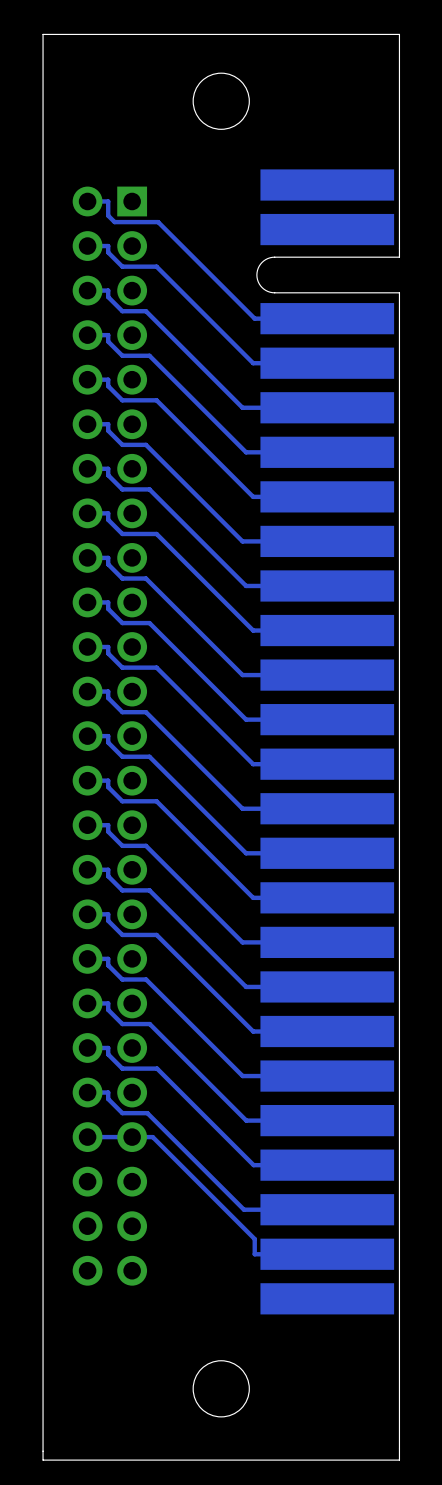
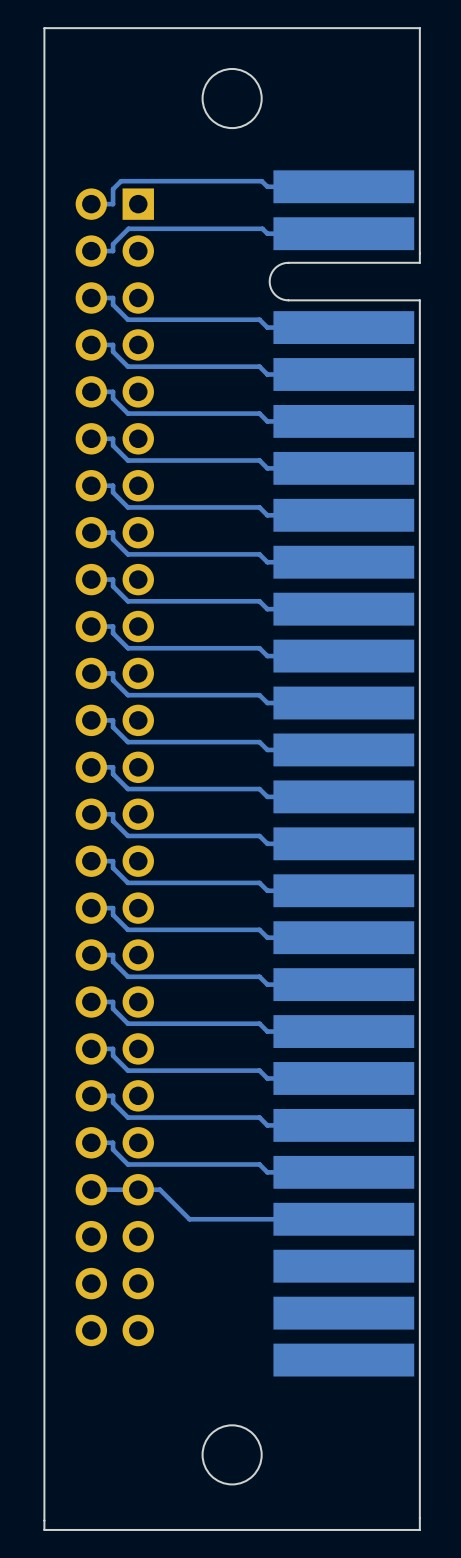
track: (108, 201) (108, 215) (114, 222) (158, 222) (247, 311) -> (113, 204) (113, 189) (121, 181) (261, 181) (267, 186) (343, 186)
track: (108, 246) (108, 252) (122, 266) (156, 266) (254, 363) -> (113, 251) (113, 244) (128, 228) (262, 228) (267, 233) (343, 233)
track: (145, 311) (242, 407) (254, 407) -> (152, 319) (259, 319)
track: (149, 355) (246, 452) (254, 452) -> (156, 366) (259, 366) (267, 374)
track: (156, 400) (254, 496) -> (164, 413) (259, 413) (267, 421)
track: (145, 444) (242, 541) (254, 541) -> (152, 460) (259, 460) (267, 468)
track: (149, 489) (246, 585) (254, 585) -> (156, 507) (259, 507) (267, 515)
track: (156, 533) (254, 630) -> (164, 554) (259, 554) (267, 562)
track: (145, 578) (242, 675) (254, 675) -> (152, 601) (259, 601) (267, 609)
track: (149, 623) (246, 719) (254, 719) -> (156, 648) (259, 648) (267, 656)
track: (156, 667) (254, 764) -> (164, 695) (259, 695) (267, 703)
track: (145, 712) (242, 808) (254, 808) -> (152, 742) (259, 742) (267, 749)
track: (149, 756) (246, 853) (254, 853) -> (156, 789) (259, 789) (267, 796)
track: (156, 801) (254, 897) -> (164, 835) (259, 835) (267, 843)
track: (146, 845) (242, 942) (254, 942) -> (152, 882) (259, 882) (267, 890)
track: (149, 890) (246, 986) (254, 986) -> (156, 929) (259, 929) (267, 937)
track: (156, 934) (254, 1031) -> (164, 976) (259, 976) (267, 984)
track: (146, 979) (242, 1076) (254, 1076) -> (152, 1023) (259, 1023) (267, 1031)
track: (149, 1024) (246, 1120) (254, 1120) -> (156, 1070) (259, 1070) (267, 1078)
track: (157, 1068) (253, 1165) -> (164, 1117) (259, 1117) (267, 1125)
track: (147, 1113) (243, 1209) (327, 1209) -> (154, 1164) (259, 1164) (267, 1172)
track: (180, 1165) (254, 1239) (254, 1254) (327, 1254) -> (189, 1219) (266, 1219)

